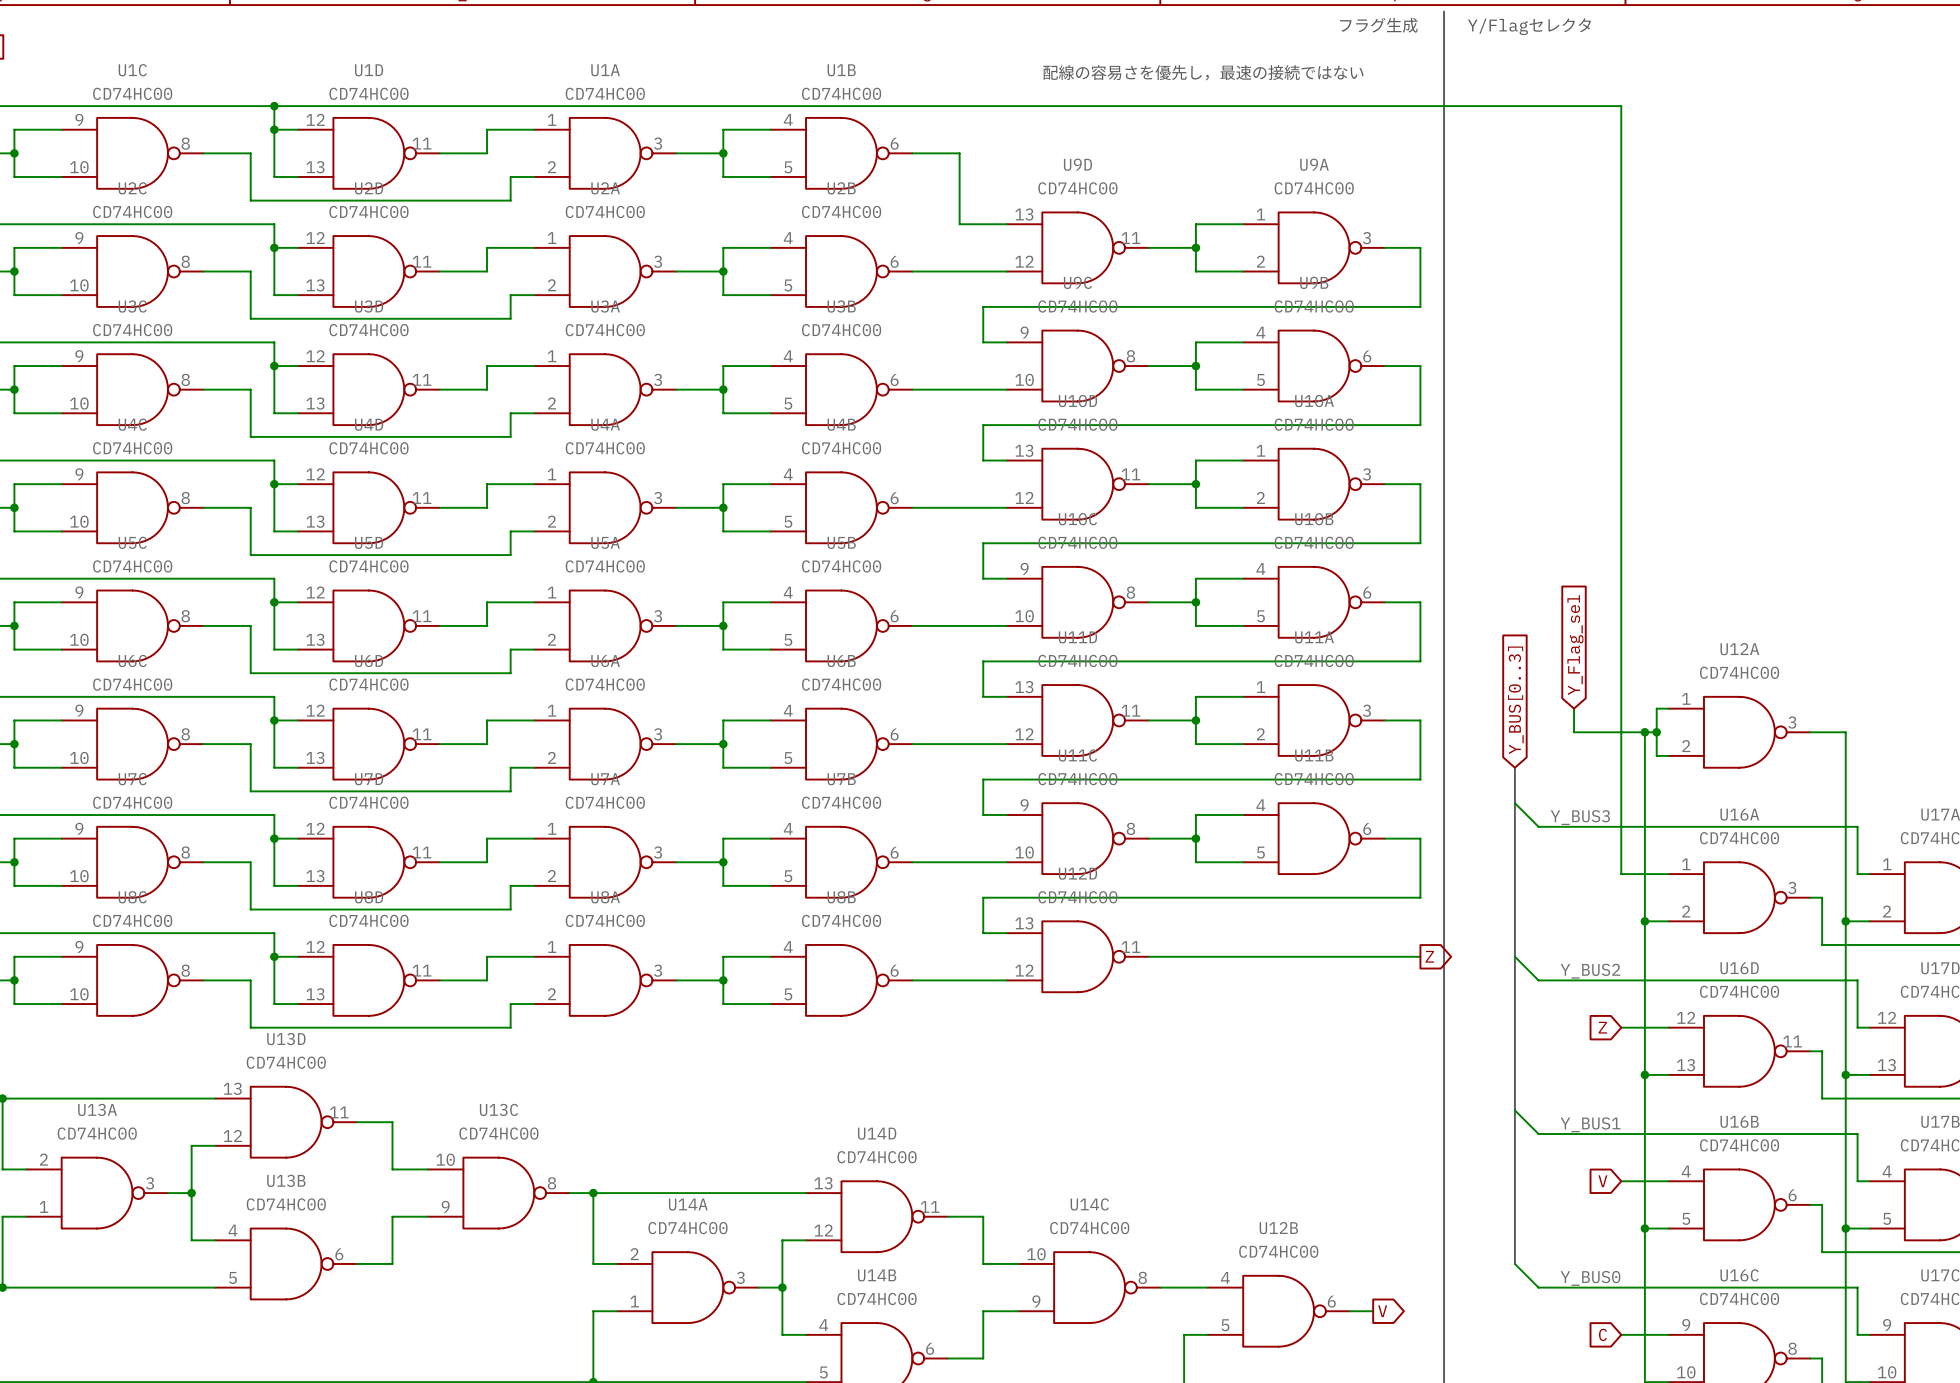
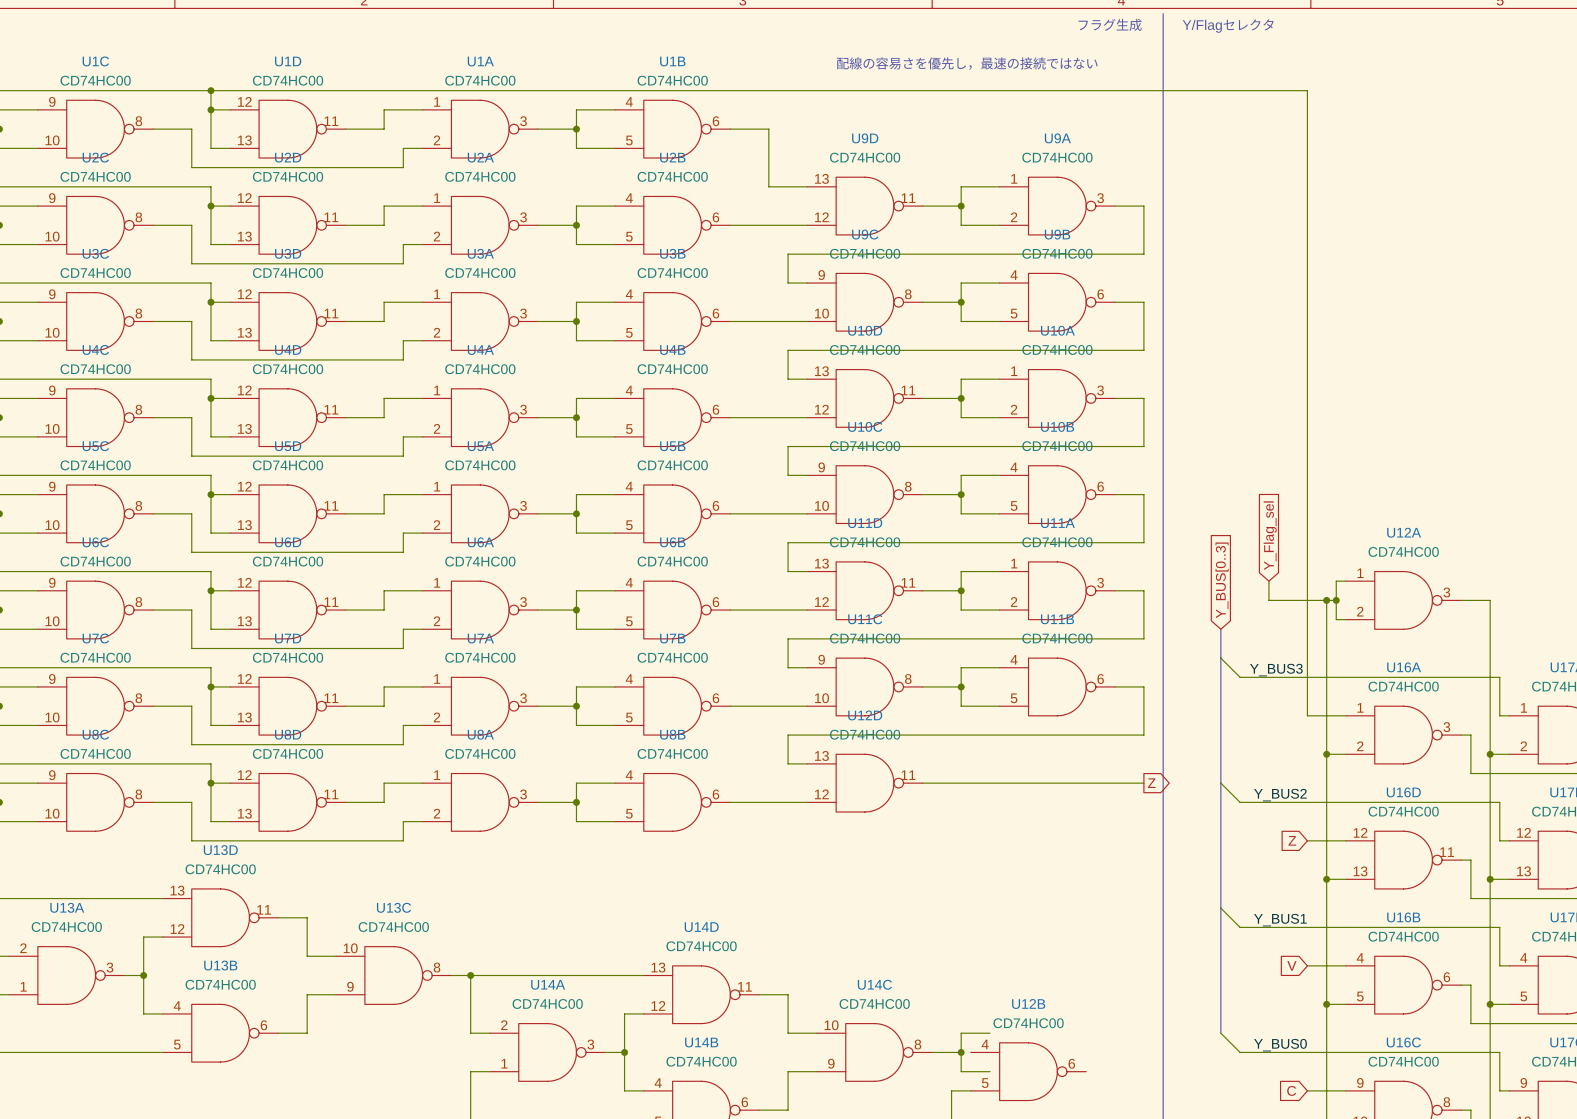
wire: none -> (990, 1033) (961, 1033) (961, 1071) (990, 1071)
wire: (1195, 1287) (1207, 1287) -> none
junction: none -> (961, 1052)
wire: (1349, 1311) (1373, 1311) -> none
global label: V (1382, 1311) -> none

